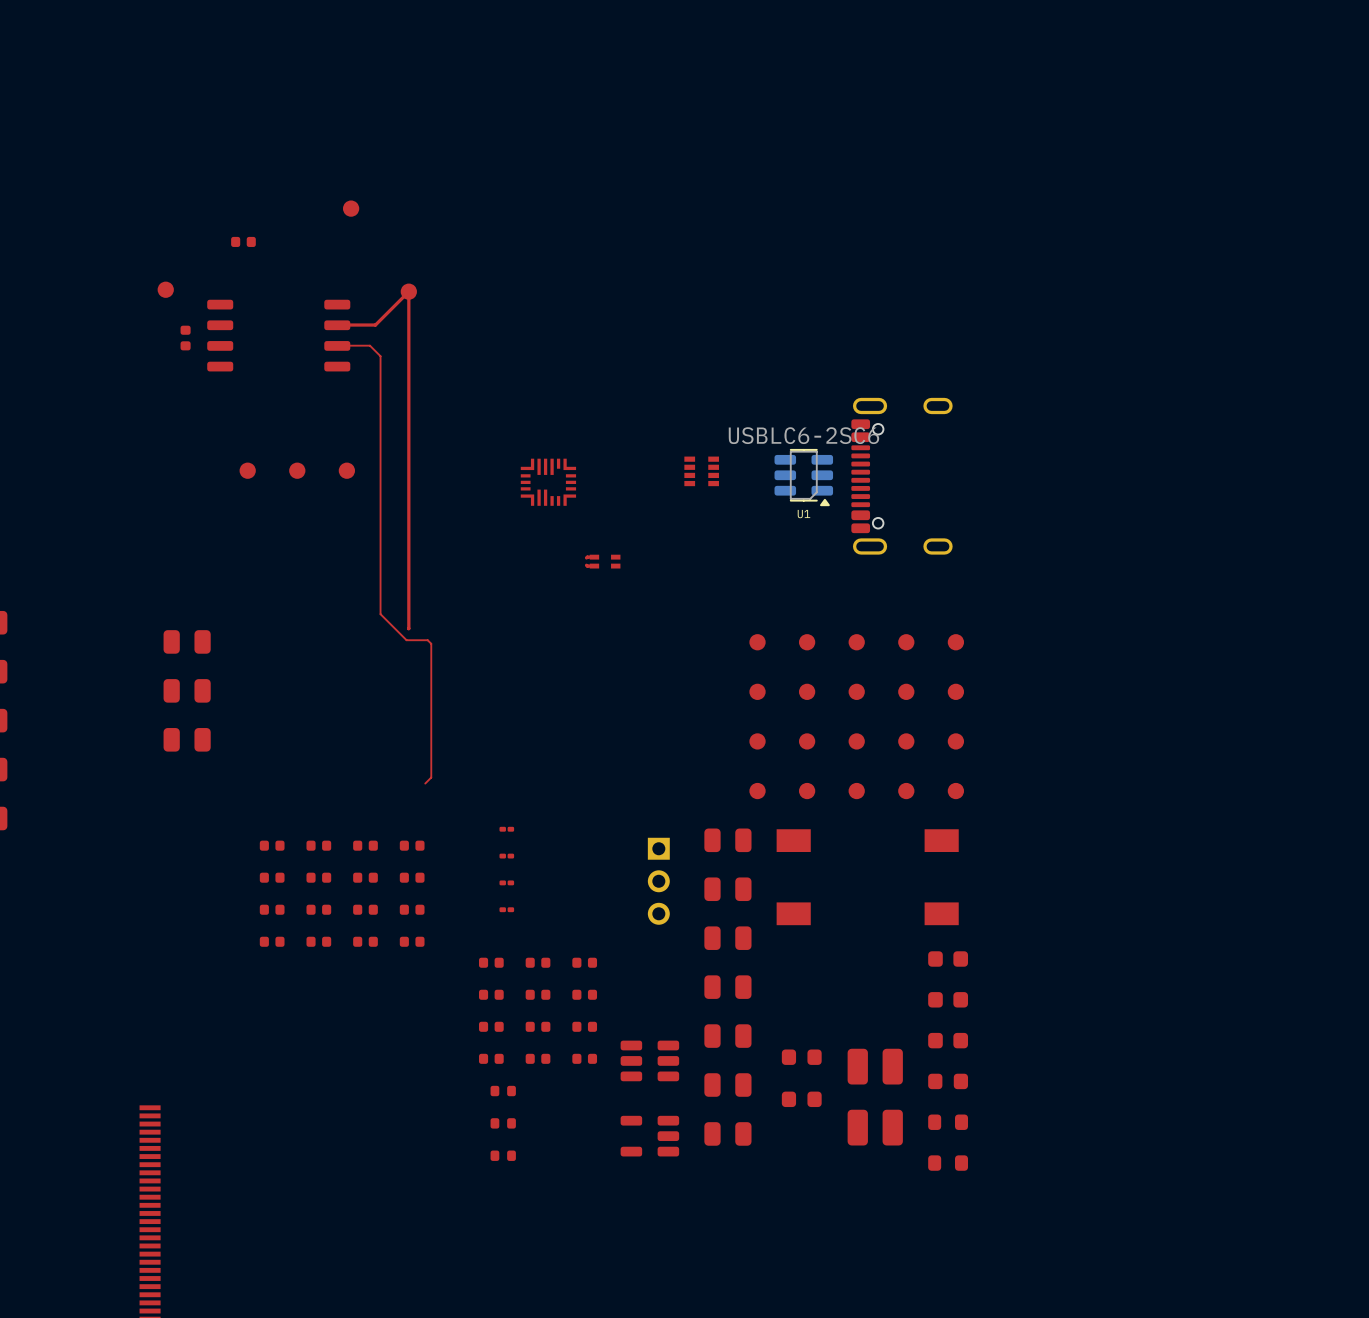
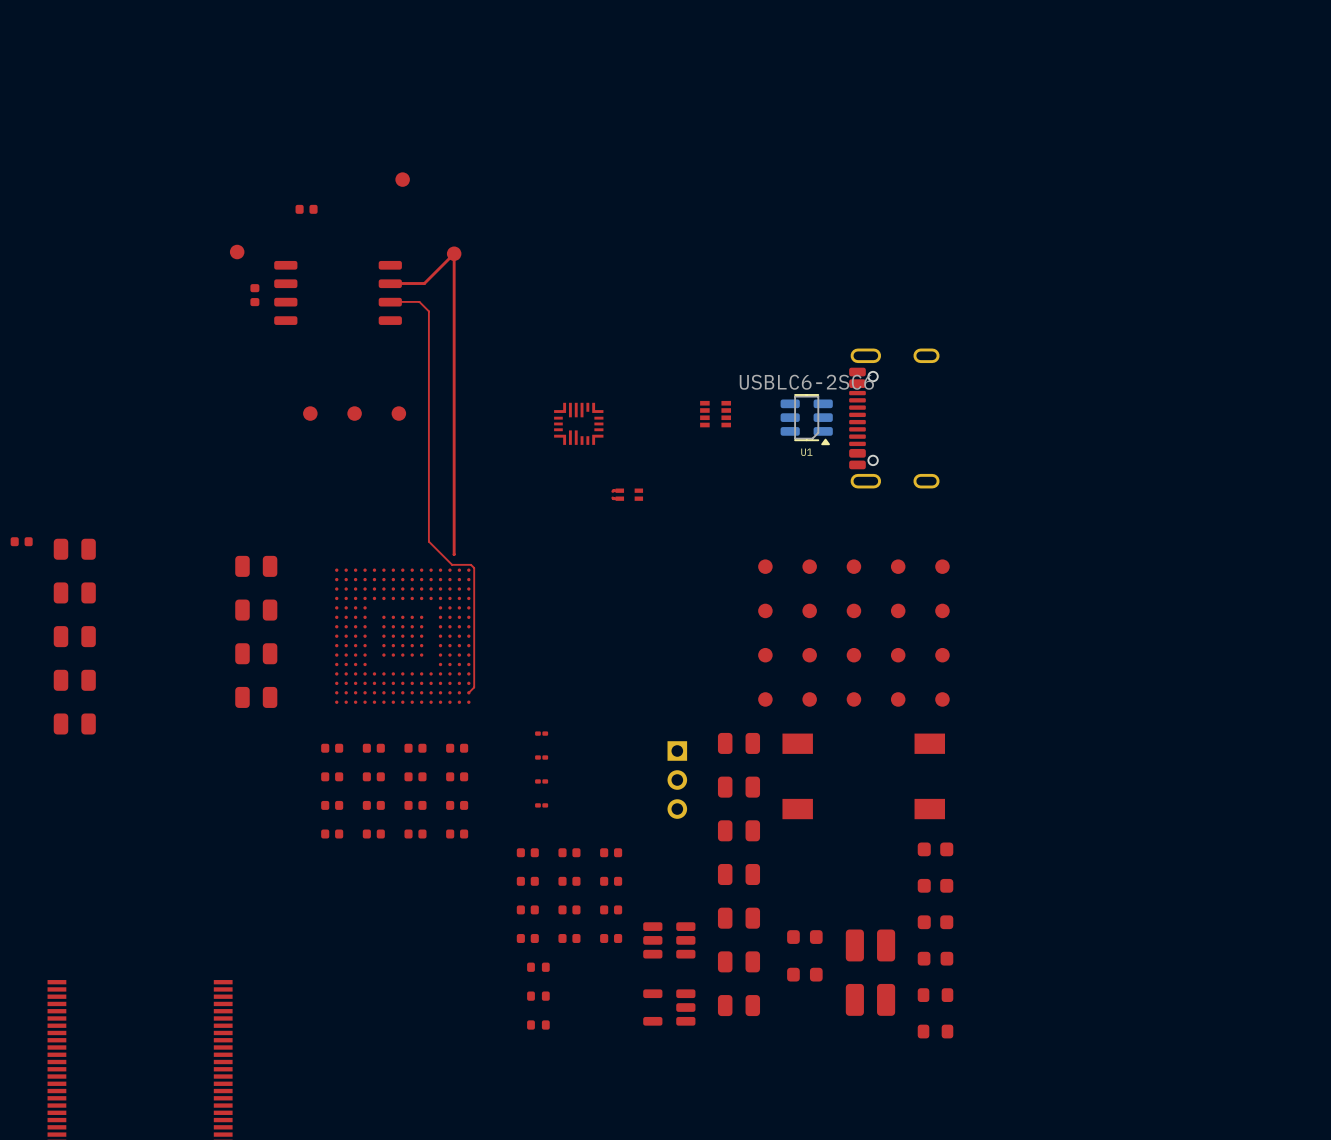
part: none -> (402, 636)
part: none -> (256, 697)

